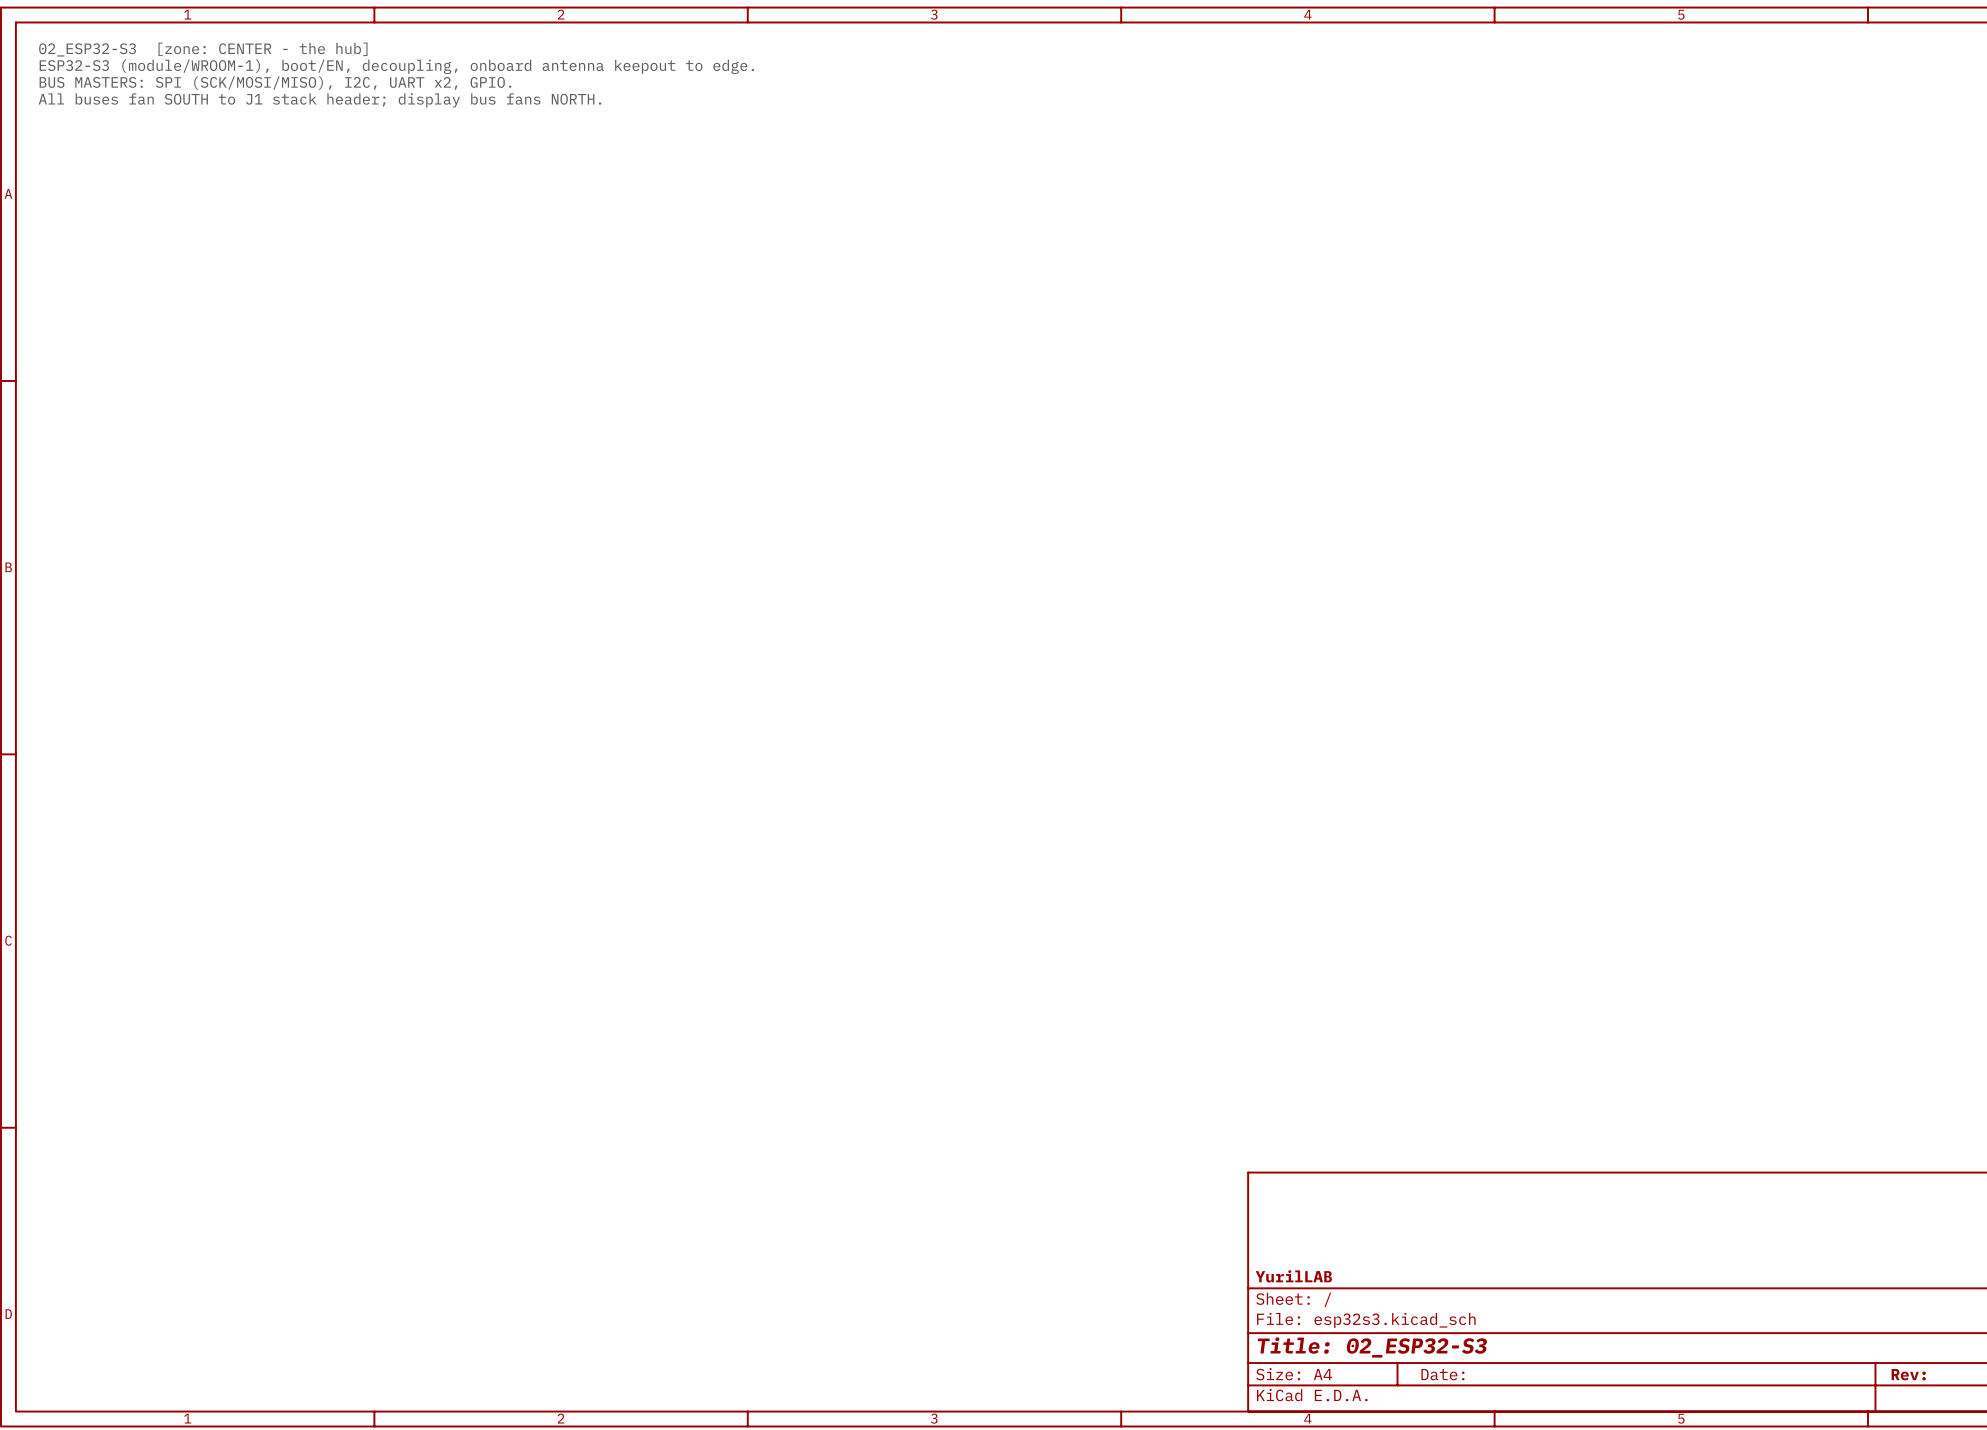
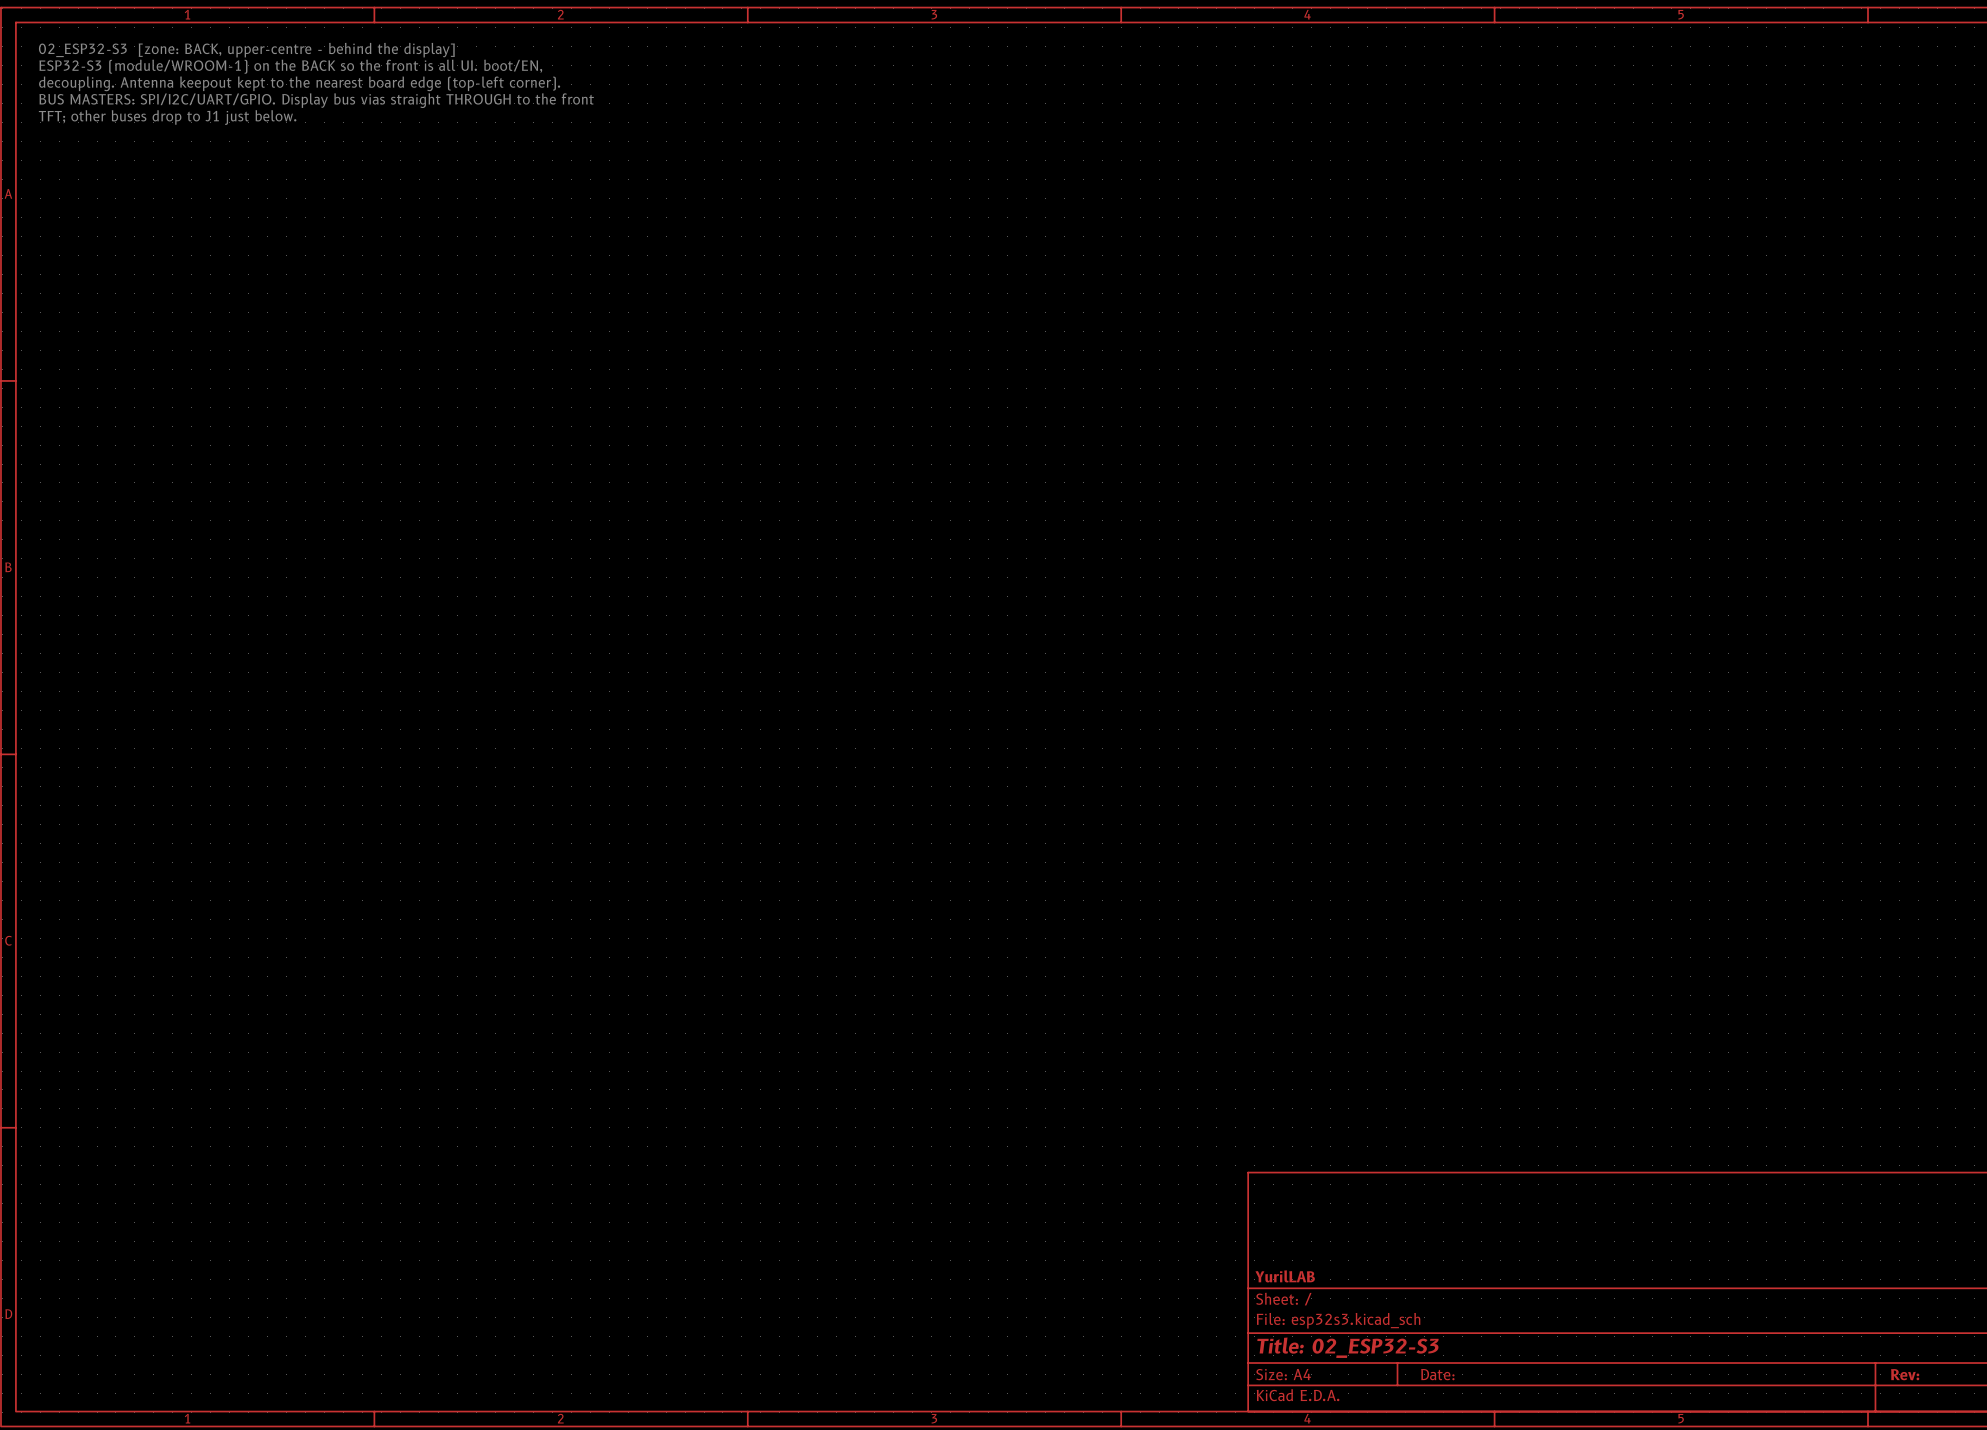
text: 02_ESP32-S3 [zone: CENTER - the hub] (203, 49) -> 02_ESP32-S3 [zone: BACK, upper-centre - behind the display] (246, 50)
text: ESP32-S3 (module/WROOM-1), boot/EN, decoupling, onboard antenna keepout to edge. (396, 66) -> ESP32-S3 (module/WROOM-1) on the BACK so the front is all UI. boot/EN, (290, 66)
text: BUS MASTERS: SPI (SCK/MOSI/MISO), I2C, UART x2, GPIO. (275, 83) -> decoupling. Antenna keepout kept to the nearest board edge (top-left corner). (299, 83)
text: All buses fan SOUTH to J1 stack header; display bus fans NORTH. (319, 100) -> BUS MASTERS: SPI/I2C/UART/GPIO. Display bus vias straight THROUGH to the front (316, 100)
text: none -> TFT; other buses drop to J1 just below. (167, 117)

